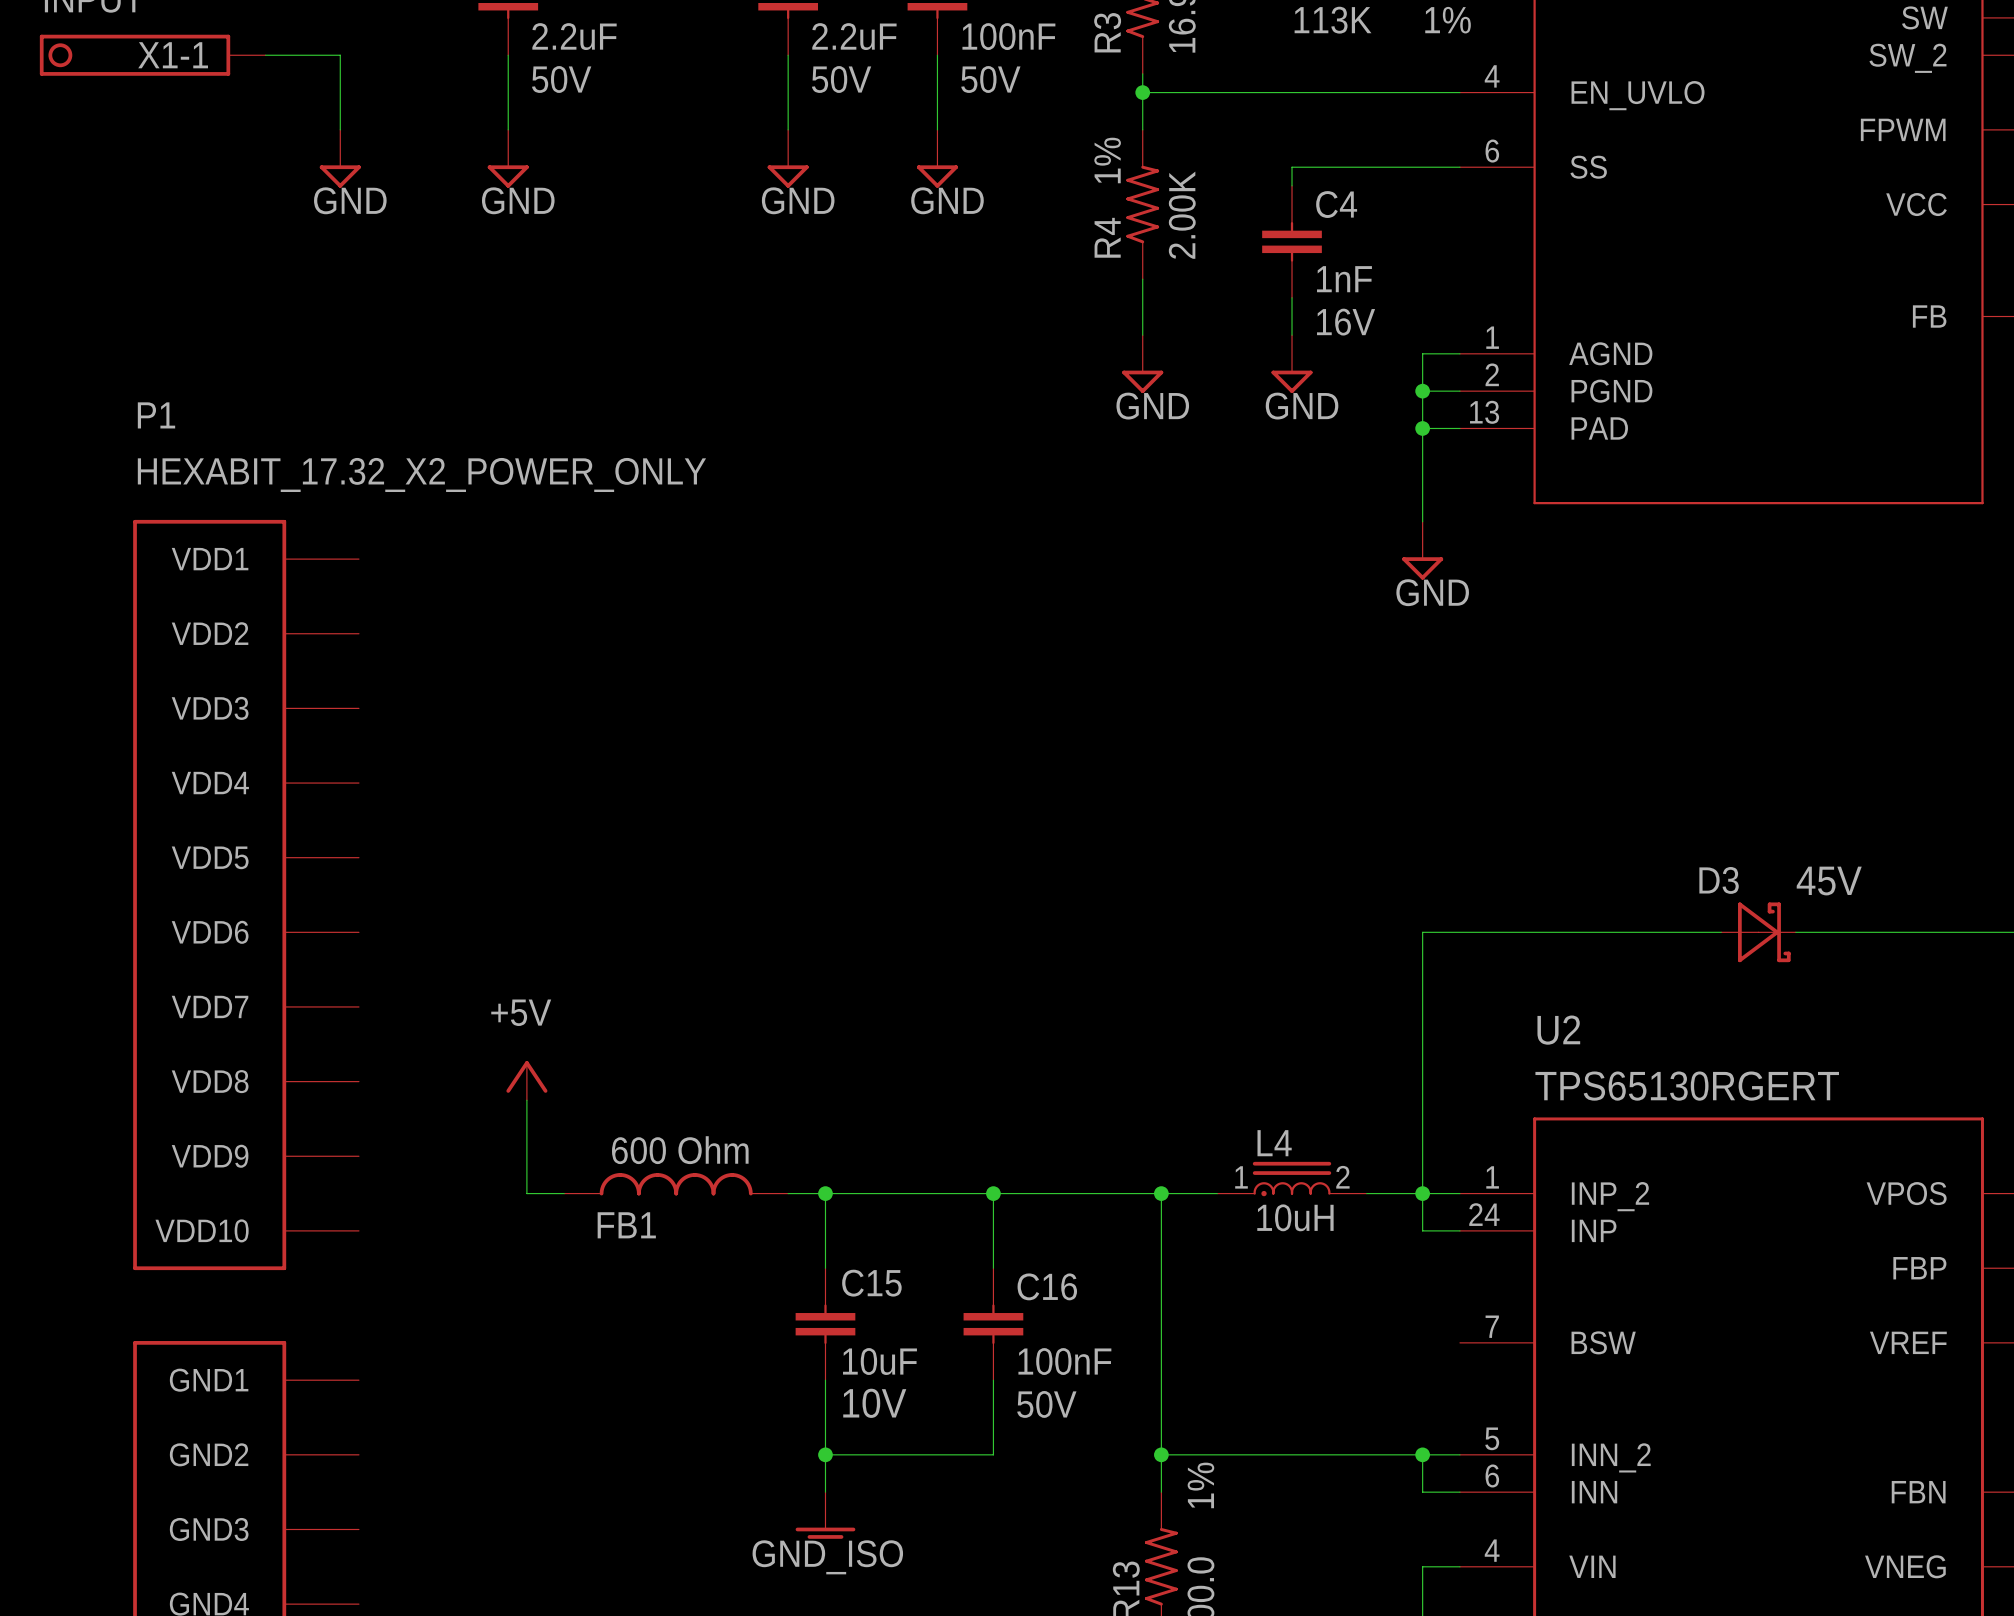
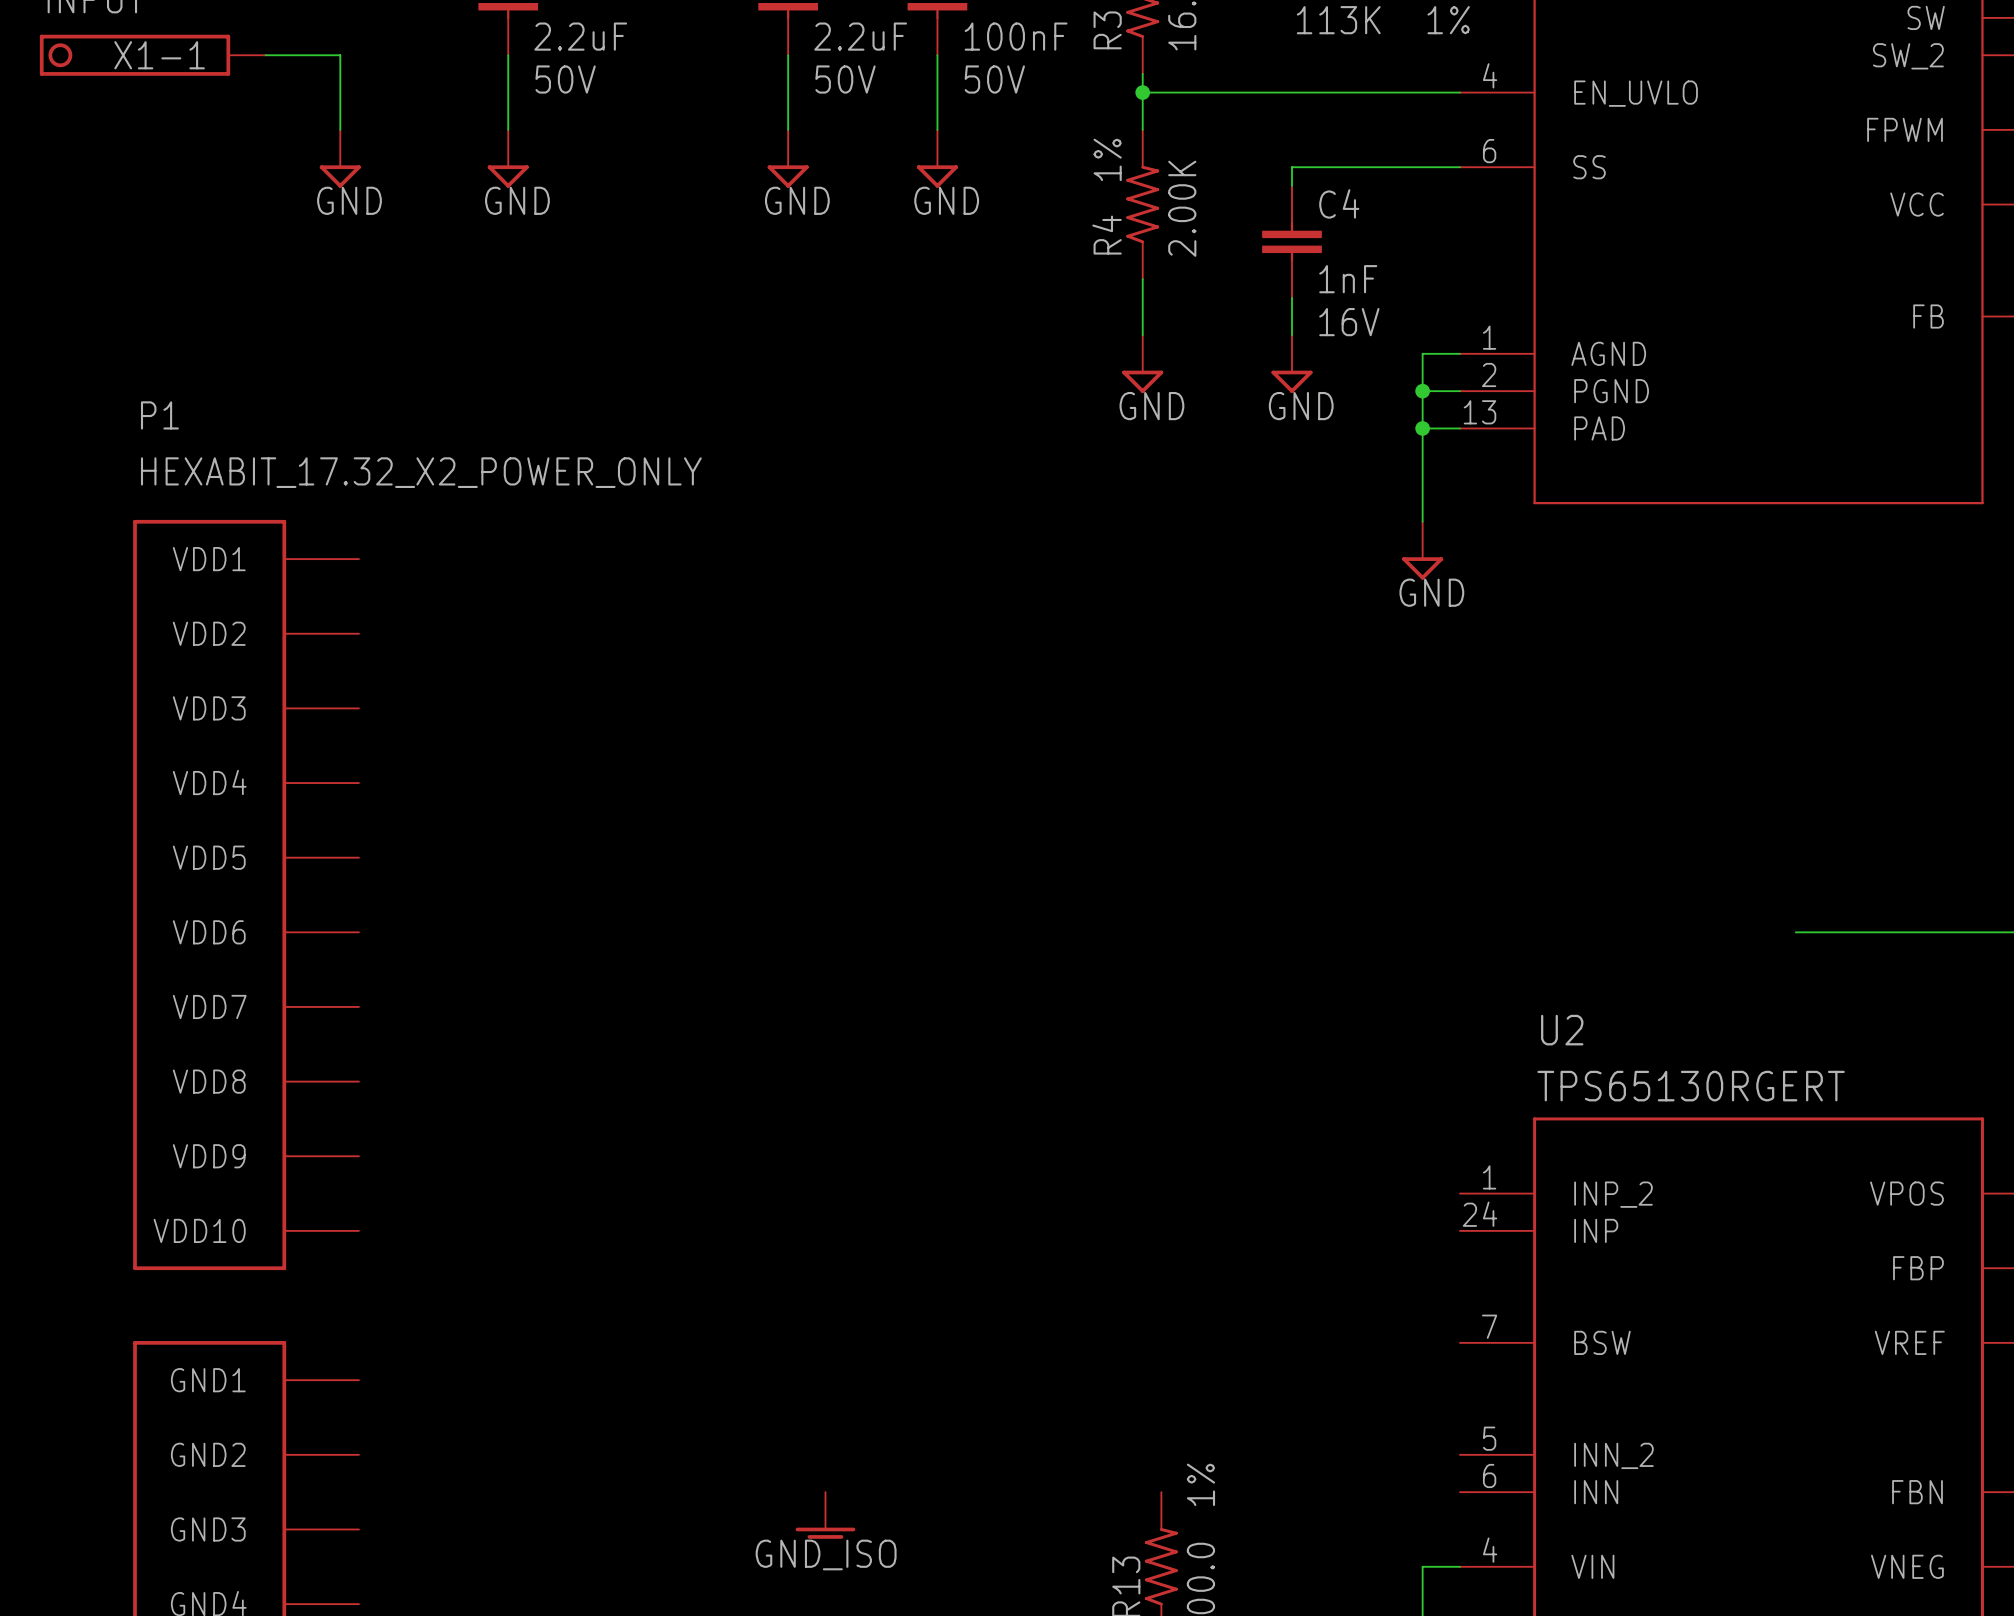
wire: (1721, 932) (1422, 932) (1422, 1230) (1459, 1230) -> none
D3: (1758, 932) -> none
power symbol: +5V (526, 1080) -> none
wire: (526, 1100) (526, 1193) (564, 1193) -> none
L4: 10uH (1292, 1179) -> none
FB1: 600 Ohm (676, 1184) -> none
wire: (788, 1193) (1217, 1193) -> none
wire: (825, 1193) (825, 1268) -> none
junction: (825, 1193) -> none
wire: (993, 1193) (993, 1268) -> none
junction: (993, 1193) -> none
wire: (1161, 1193) (1161, 1492) -> none
junction: (1161, 1193) -> none
wire: (1366, 1193) (1459, 1193) -> none
junction: (1422, 1193) -> none
C15: 10uF (825, 1324) -> none
C16: 100nF (993, 1324) -> none
wire: (825, 1380) (825, 1492) -> none
wire: (993, 1380) (993, 1454) (825, 1454) -> none
junction: (825, 1454) -> none
wire: (1161, 1454) (1459, 1454) -> none
junction: (1161, 1454) -> none
wire: (1422, 1454) (1422, 1492) (1459, 1492) -> none
junction: (1422, 1454) -> none

